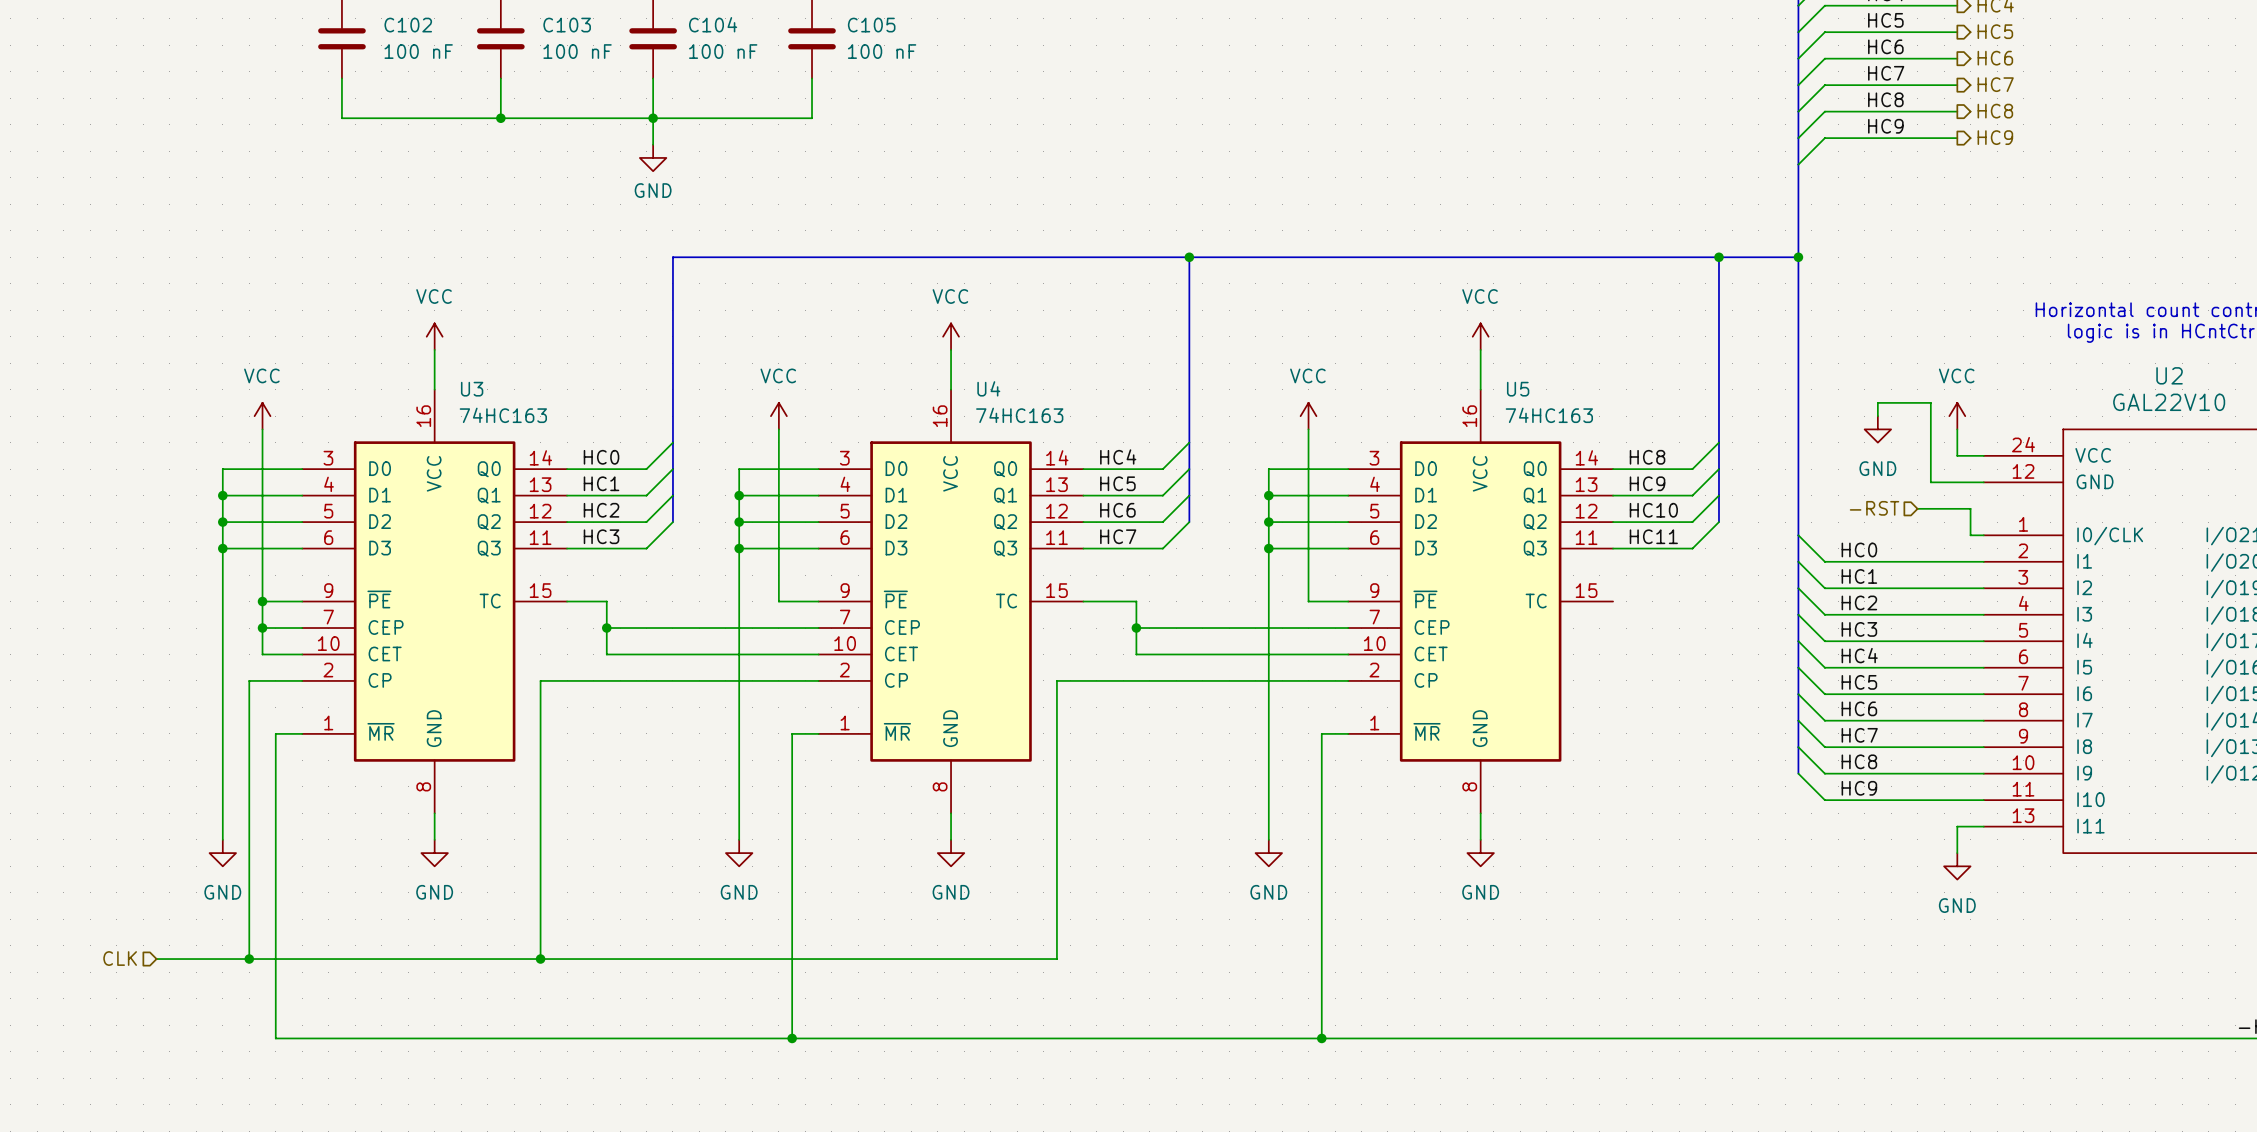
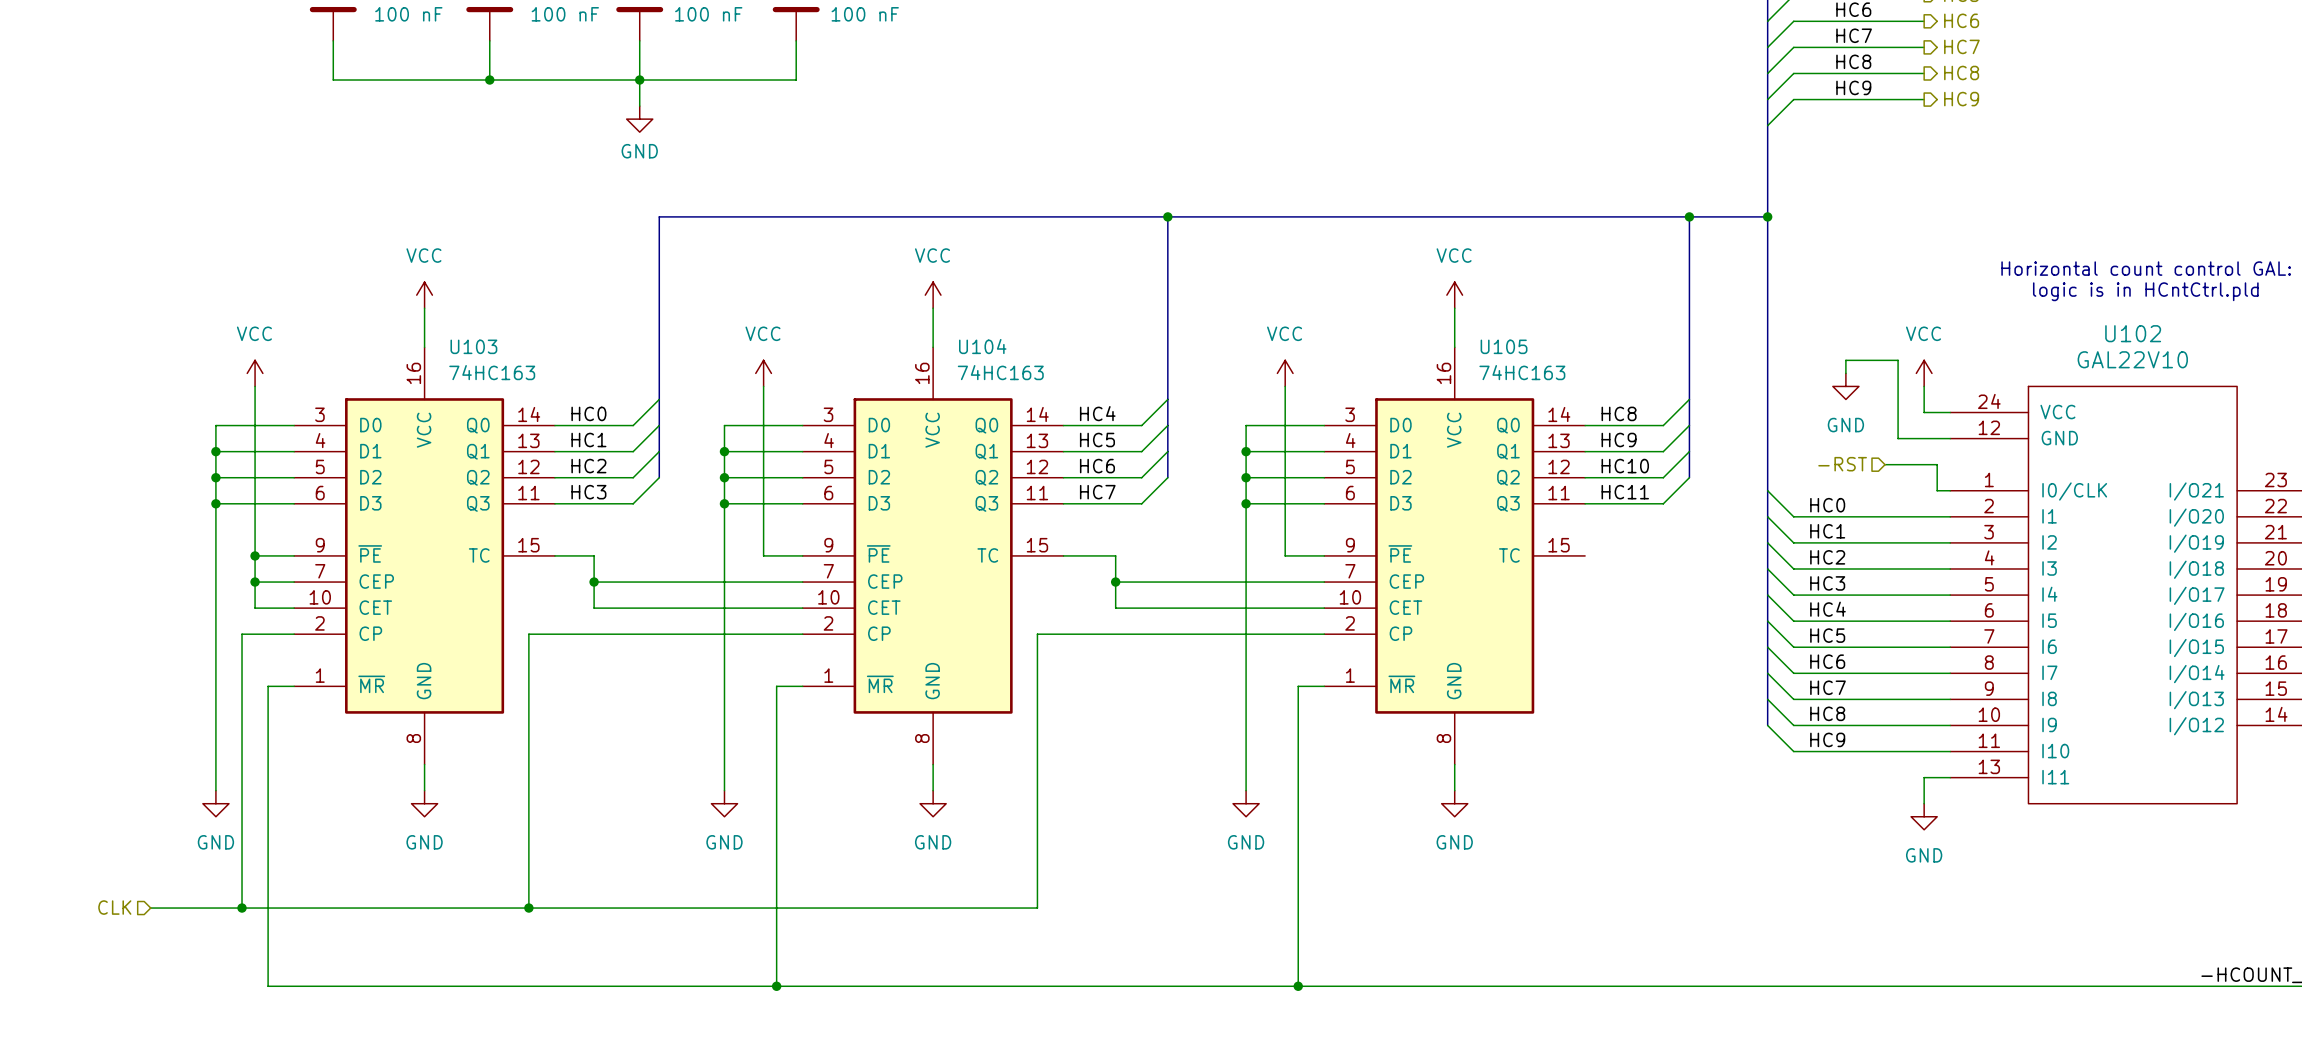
U2 name: U2 (2169, 375) -> U102 (2133, 333)
U4 name: U4 (988, 388) -> U104 (982, 346)
U3 name: U3 (472, 389) -> U103 (473, 346)
U5 name: U5 (1518, 389) -> U105 (1504, 346)

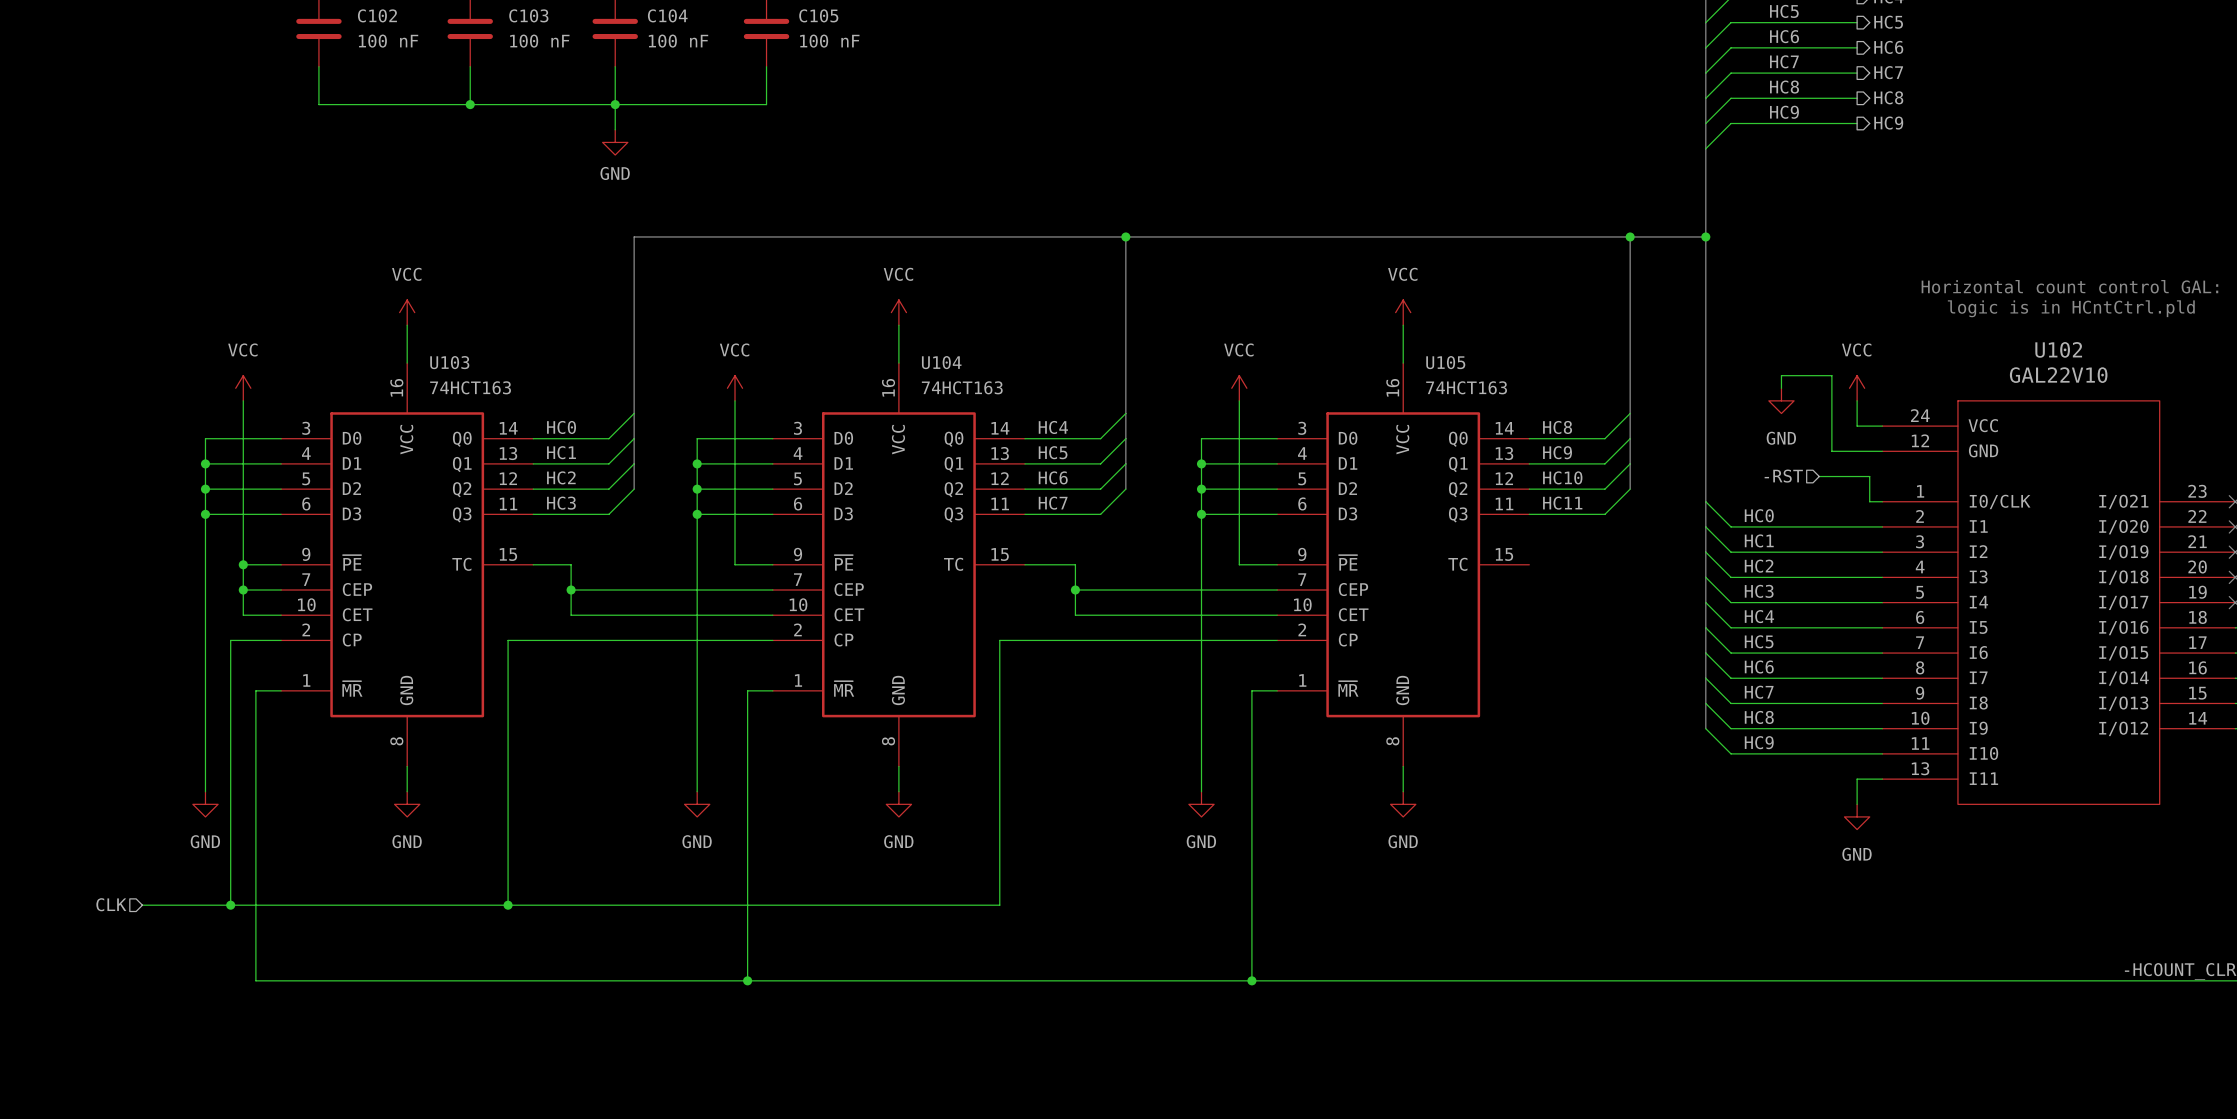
U103 value: 74HC163 (492, 372) -> 74HCT163 (470, 387)
U104 value: 74HC163 (1000, 372) -> 74HCT163 (962, 387)
U105 value: 74HC163 (1522, 372) -> 74HCT163 (1466, 387)

